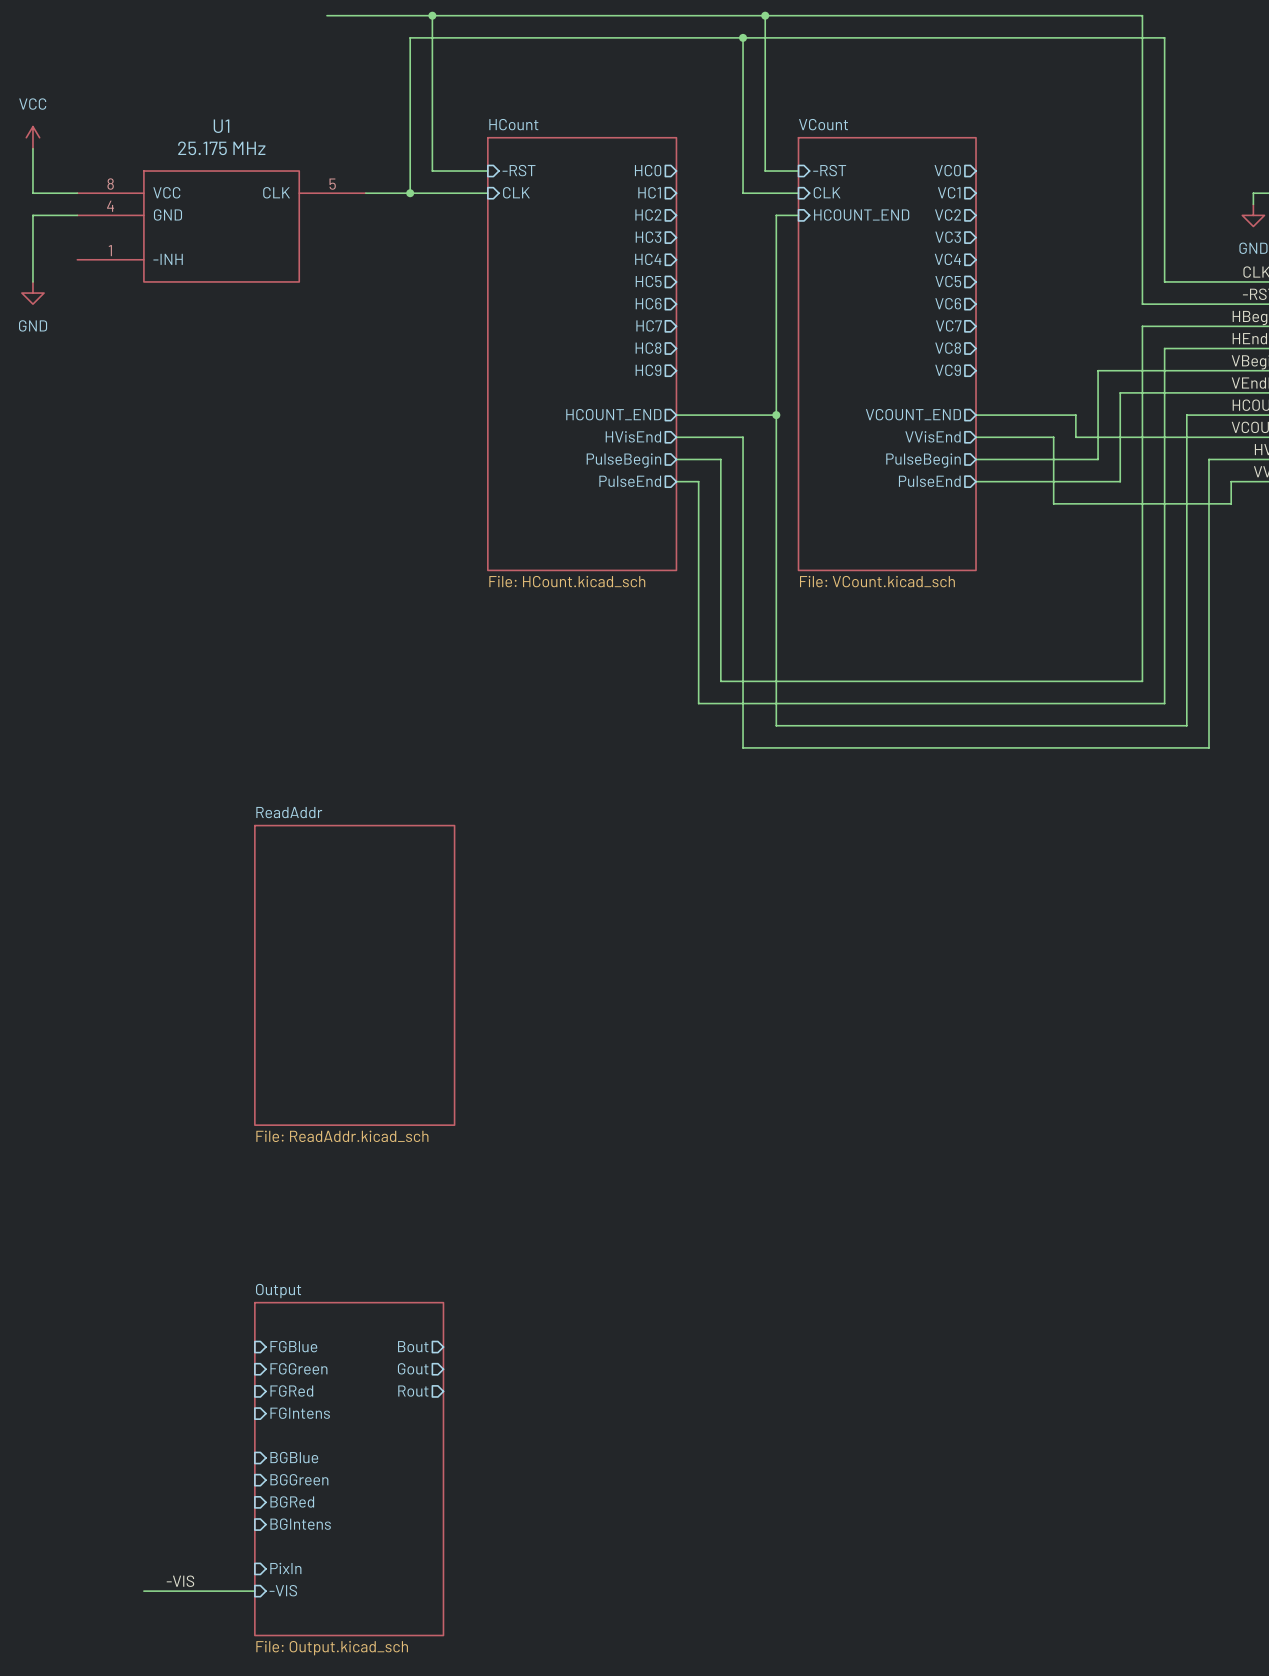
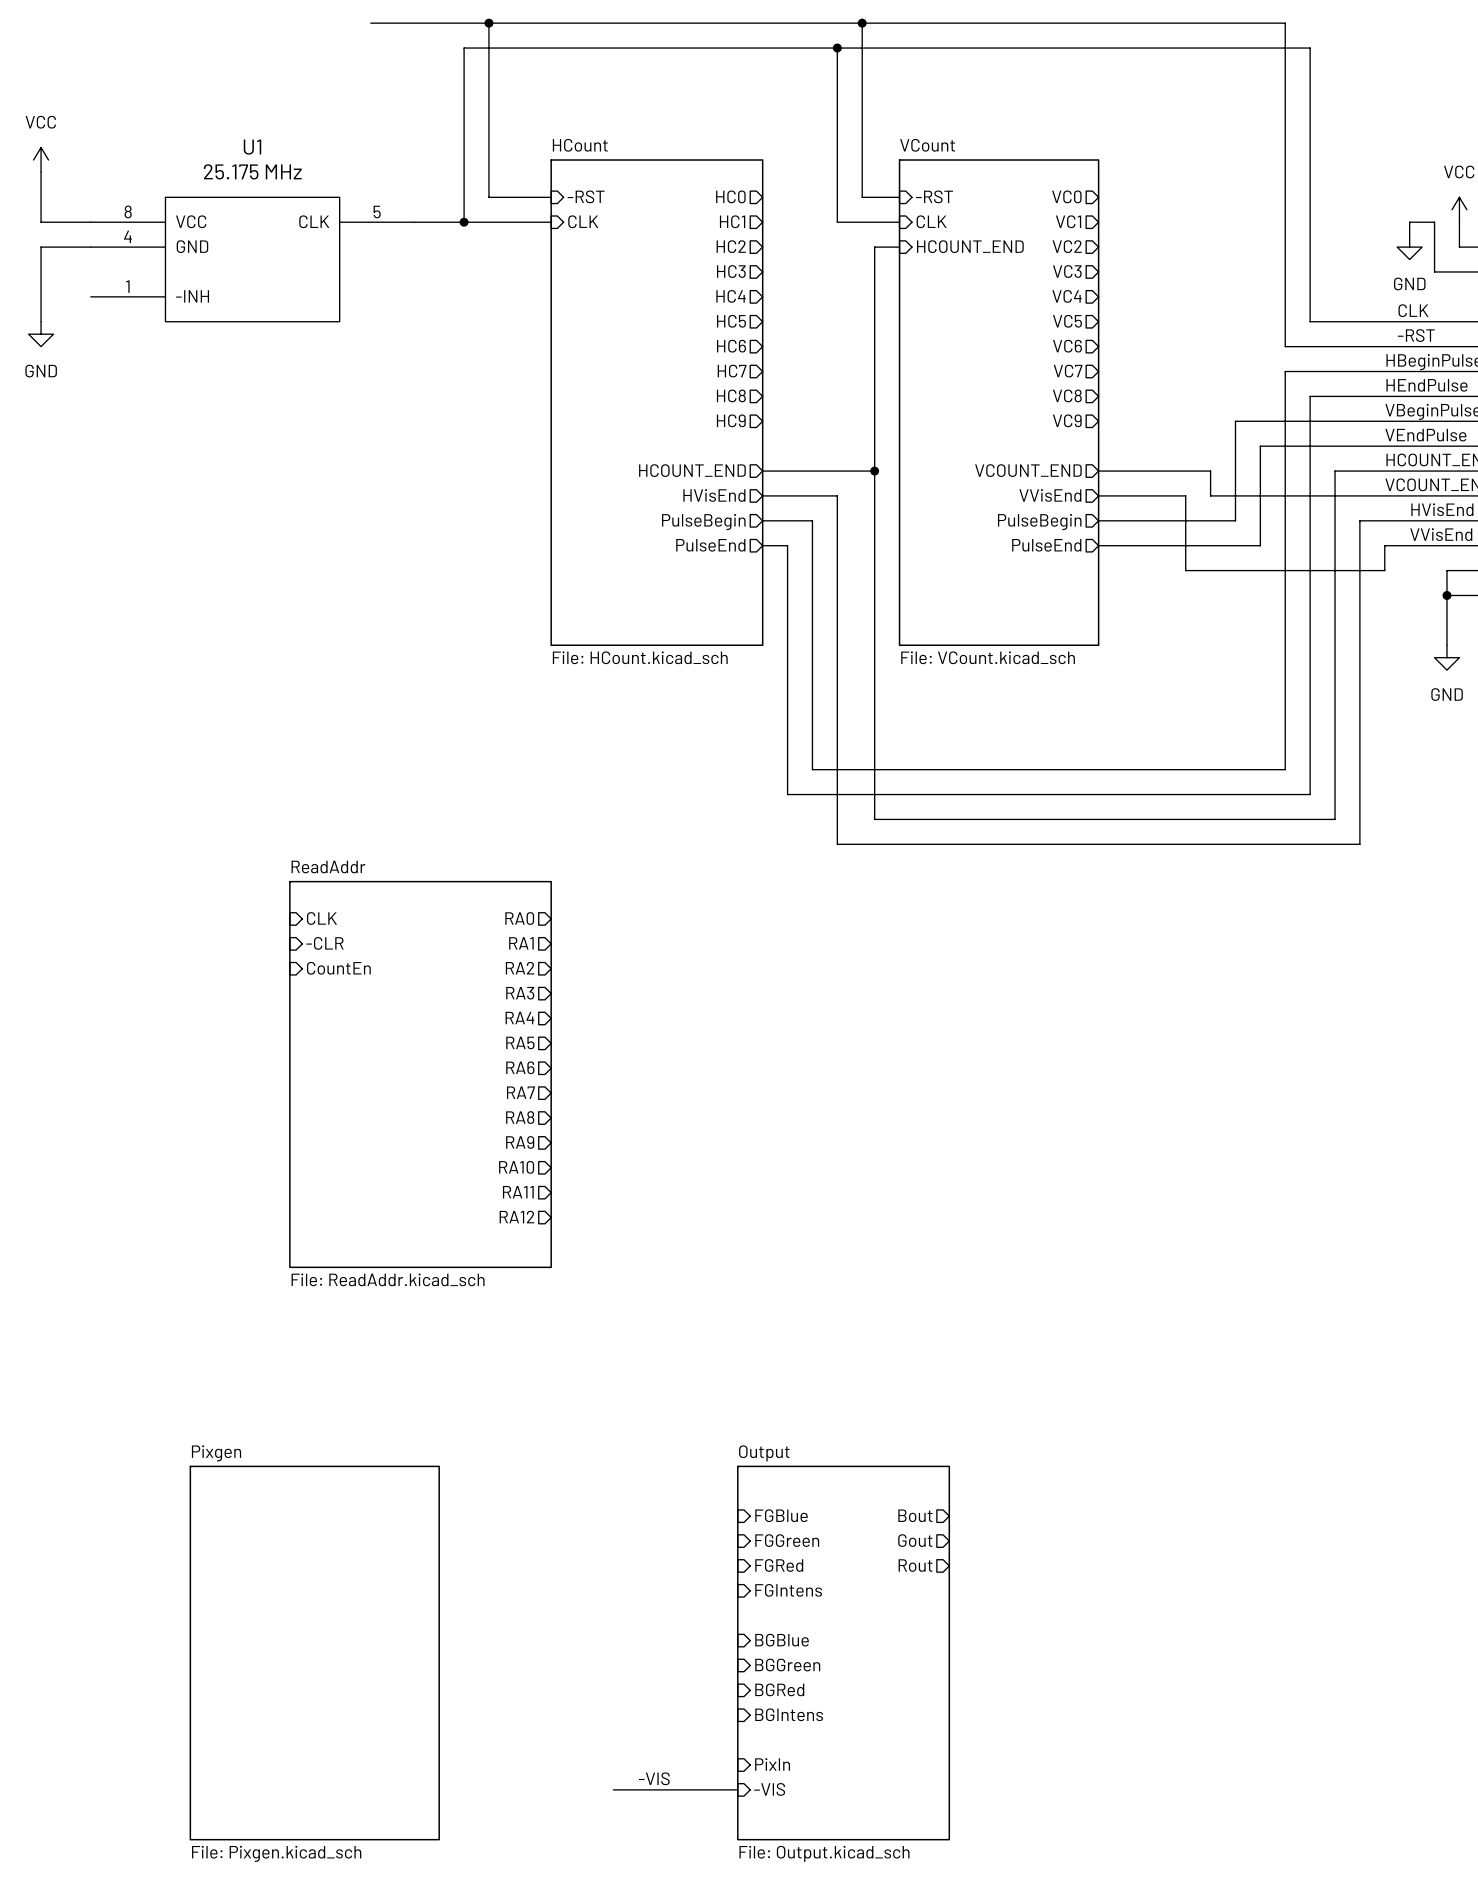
sheet pin: none -> CLK (321, 918)
sheet pin: none -> RA0 (519, 918)
sheet pin: none -> -CLR (324, 943)
sheet pin: none -> RA1 (521, 943)
sheet pin: none -> CountEn (338, 968)
sheet pin: none -> RA2 (520, 968)
sheet pin: none -> RA3 (520, 993)
sheet pin: none -> RA4 (519, 1018)
sheet pin: none -> RA5 (520, 1042)
sheet pin: none -> RA6 (520, 1067)
sheet ReadAddr: none -> File: ReadAddr.kicad_sch (420, 1074)
sheet pin: none -> RA7 (520, 1092)
sheet ReadAddr: File: ReadAddr.kicad_sch (354, 975) -> none
sheet pin: none -> RA8 (520, 1117)
sheet pin: none -> RA9 (520, 1142)
sheet pin: none -> RA10 (516, 1167)
sheet pin: none -> RA11 (518, 1192)
sheet pin: none -> RA12 (516, 1217)
sheet pin: FGBlue (293, 1346) -> none
sheet pin: Bout (413, 1346) -> none
sheet pin: none -> FGBlue (781, 1515)
sheet pin: none -> Bout (915, 1515)
sheet pin: FGGreen (298, 1368) -> none
sheet pin: Gout (413, 1368) -> none
sheet pin: none -> FGGreen (787, 1540)
sheet pin: none -> Gout (915, 1540)
sheet pin: FGRed (291, 1391) -> none
sheet pin: Rout (413, 1391) -> none
sheet pin: none -> FGRed (779, 1565)
sheet pin: none -> Rout (915, 1565)
sheet pin: FGIntens (300, 1413) -> none
sheet pin: none -> FGIntens (788, 1590)
sheet pin: BGBlue (294, 1457) -> none
sheet pin: none -> BGBlue (782, 1640)
sheet Pixgen: none -> File: Pixgen.kicad_sch (314, 1653)
sheet Output: File: Output.kicad_sch (349, 1469) -> none
sheet Output: none -> File: Output.kicad_sch (843, 1653)
sheet pin: BGGreen (299, 1479) -> none
sheet pin: none -> BGGreen (787, 1665)
sheet pin: BGRed (292, 1501) -> none
sheet pin: none -> BGRed (779, 1689)
sheet pin: BGIntens (300, 1524) -> none
sheet pin: none -> BGIntens (789, 1714)
sheet pin: PixIn (285, 1568) -> none
sheet pin: none -> PixIn (772, 1764)
label: -VIS (180, 1581) -> none
label: none -> -VIS (654, 1778)
sheet pin: -VIS (283, 1590) -> none
sheet pin: none -> -VIS (769, 1789)
wire: (143, 1591) (254, 1591) -> none
wire: none -> (613, 1789) (737, 1789)

